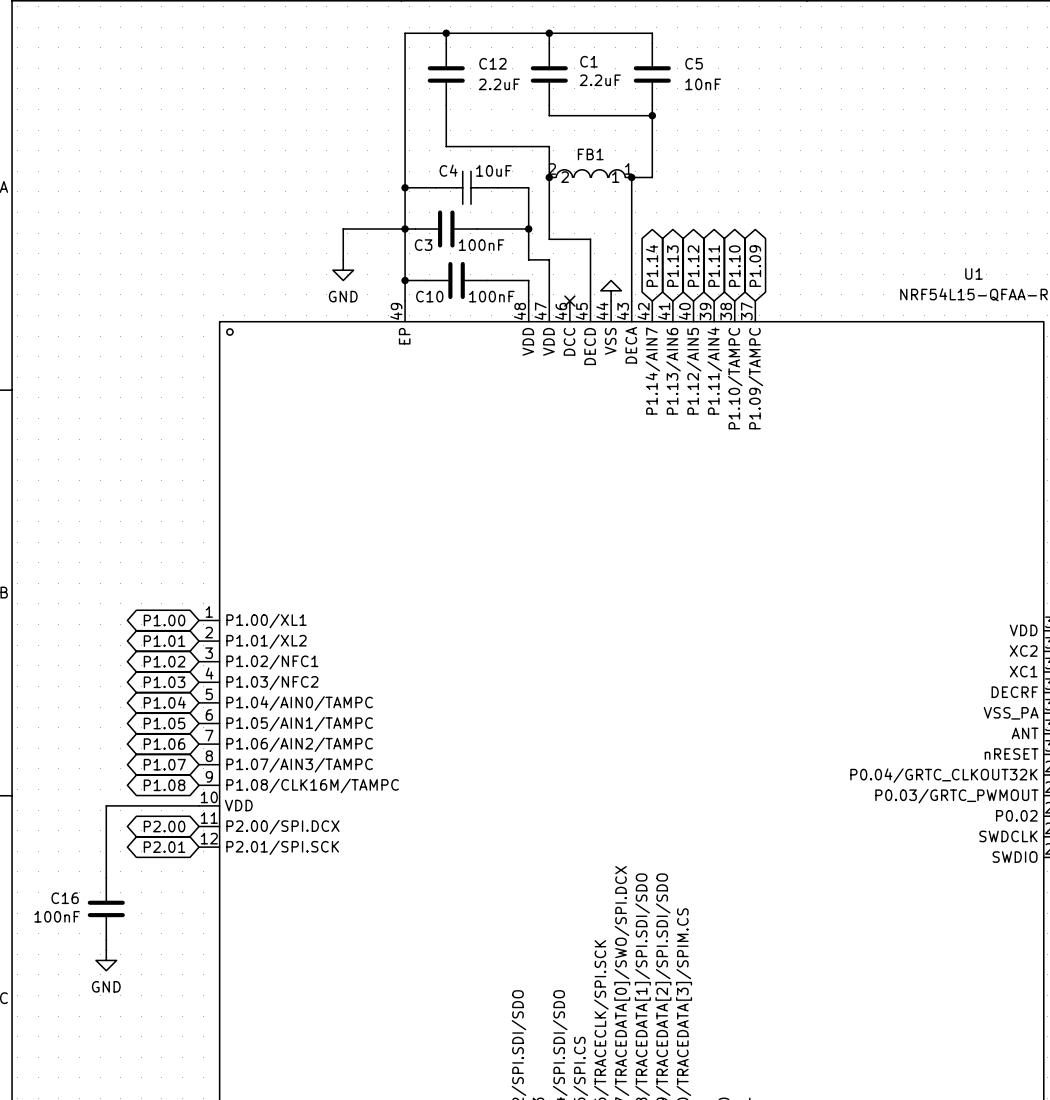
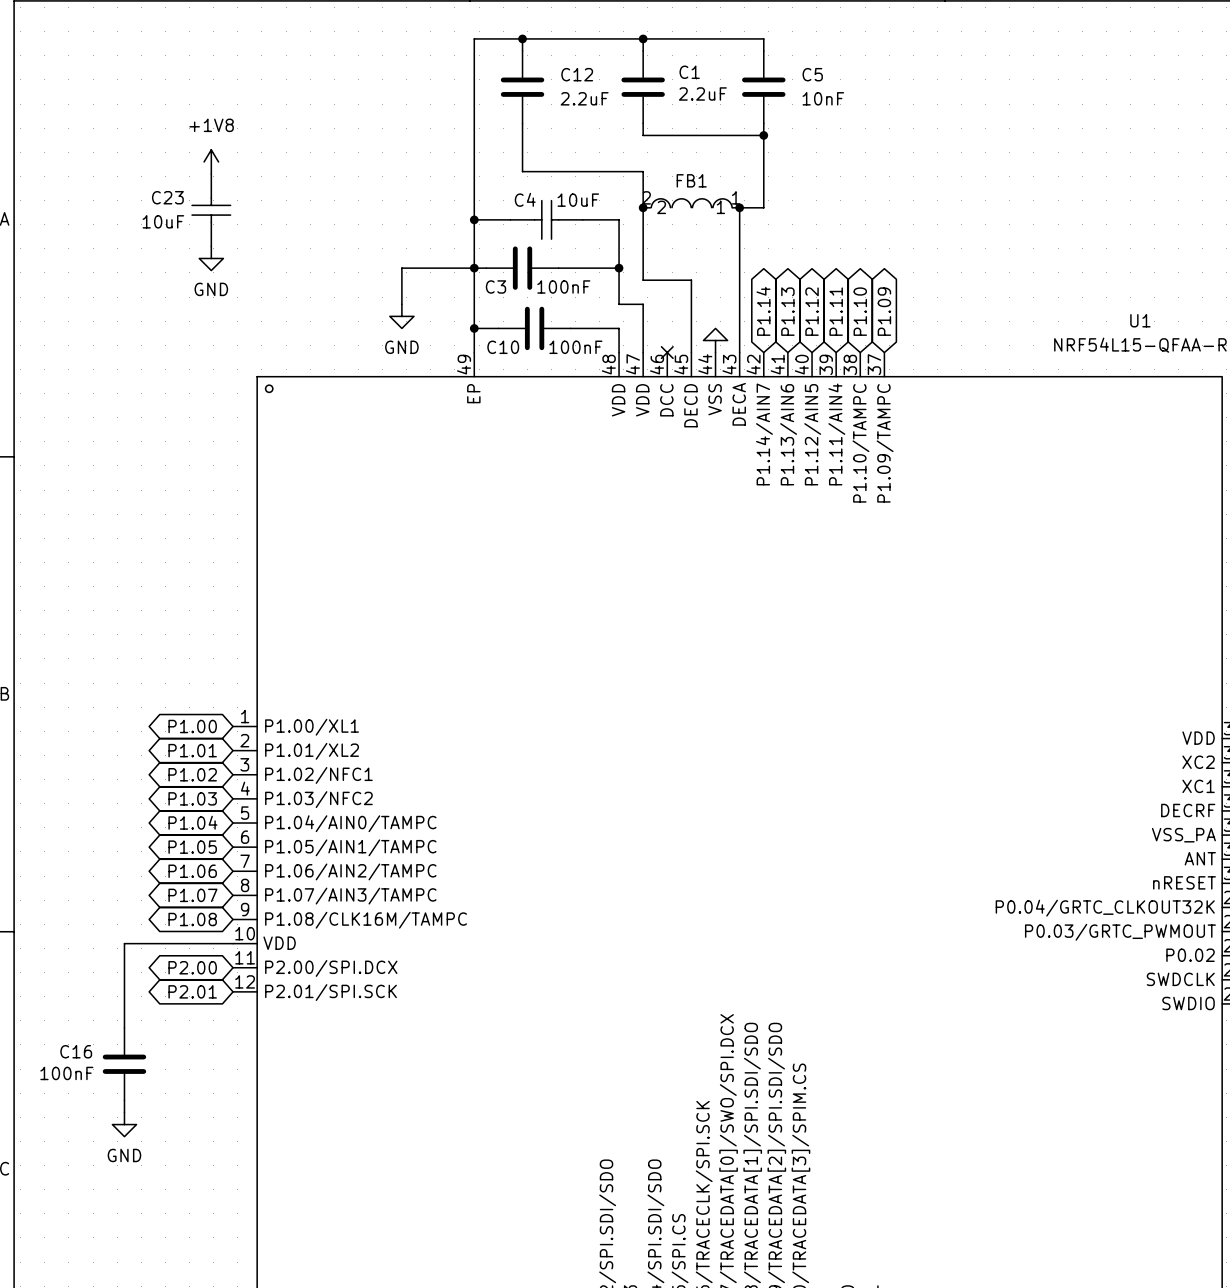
power symbol: none -> +1V8 (211, 161)
C23: none -> 10uF (211, 210)
power symbol: none -> GND (211, 258)

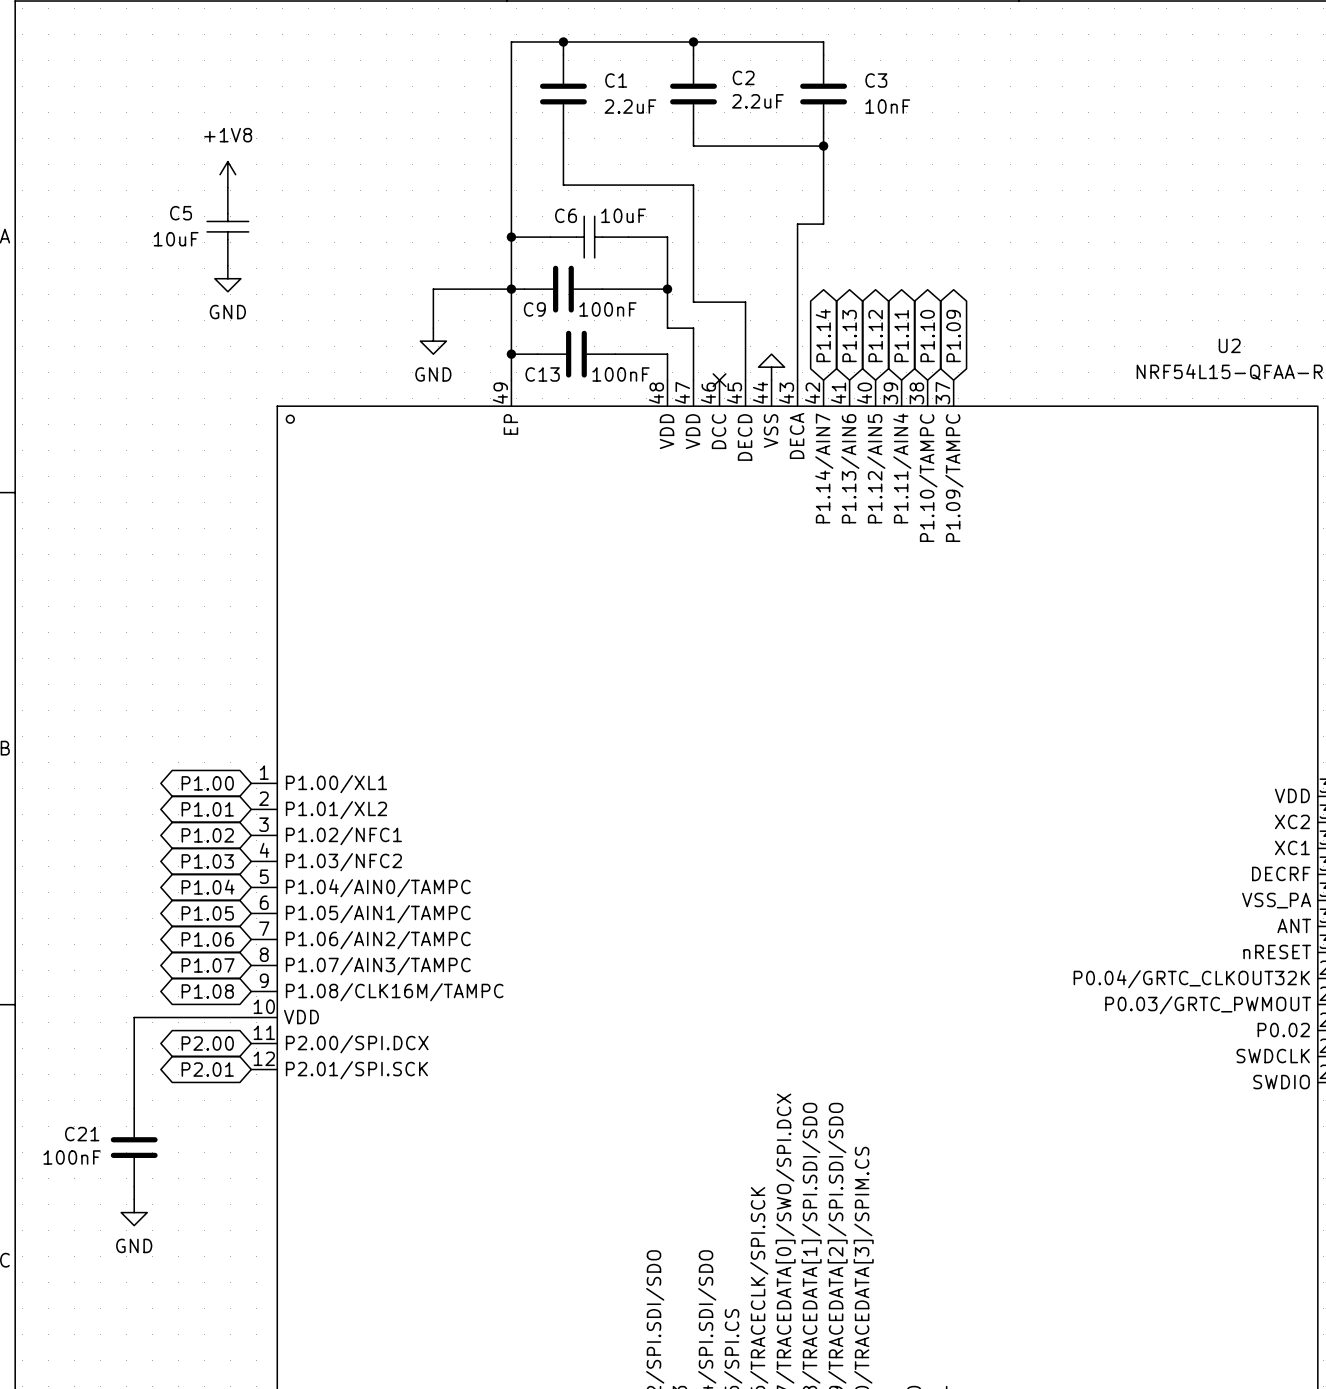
C1 name: C1 (689, 72) -> C2 (743, 77)
C12 name: C12 (577, 74) -> C1 (616, 80)
C5 name: C5 (812, 74) -> C3 (876, 80)
C23 name: C23 (167, 197) -> C5 (181, 213)
C4 name: C4 (525, 199) -> C6 (566, 215)
FB1: (691, 203) -> none
junction: (643, 207) -> none
junction: (739, 207) -> none
C3 name: C3 (495, 286) -> C9 (534, 309)
U1 name: U1 (1140, 320) -> U2 (1229, 345)
C10 name: C10 (503, 347) -> C13 (542, 374)
C16 name: C16 (76, 1051) -> C21 (82, 1134)

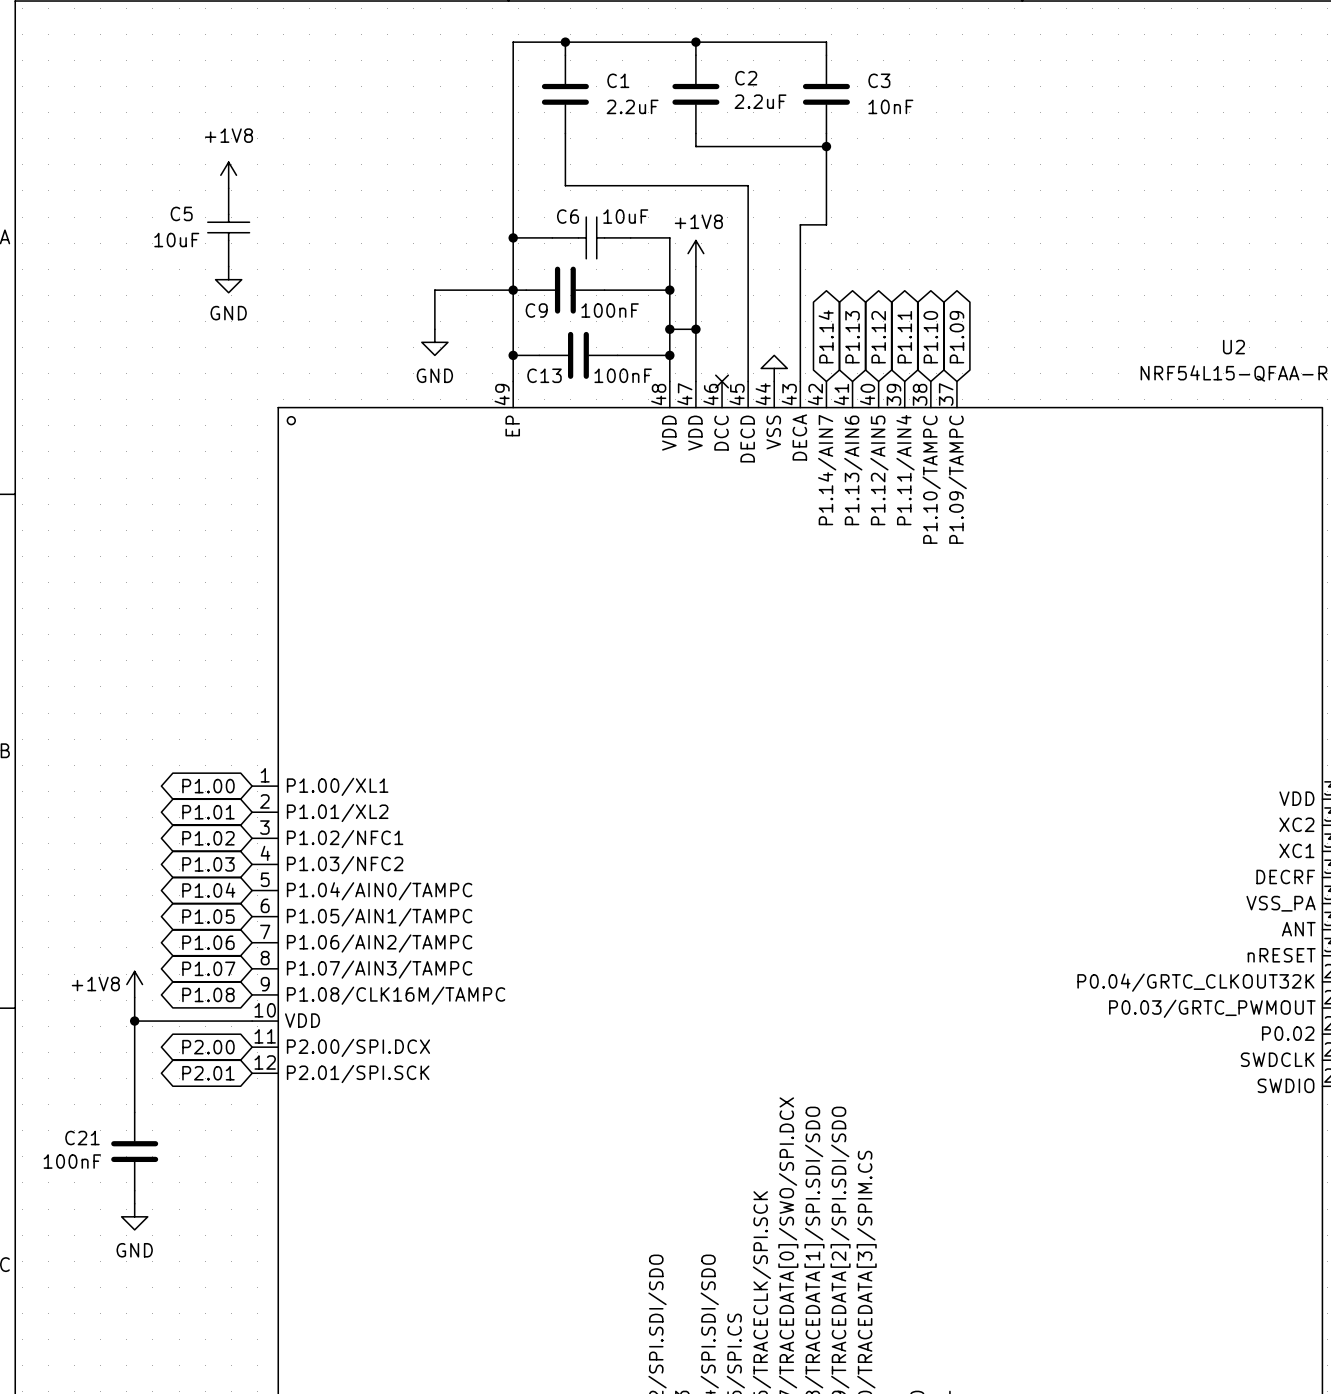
wire: (693, 185) (693, 265) -> (695, 185) (748, 185) (748, 303)
power symbol: none -> +1V8 (695, 253)
wire: (693, 302) (745, 302) -> (695, 303) (695, 329)
wire: none -> (669, 329) (669, 355)
junction: none -> (669, 329)
junction: none -> (695, 329)
junction: none -> (669, 355)
power symbol: none -> +1V8 (134, 984)
wire: none -> (134, 997) (134, 1021)
junction: none -> (134, 1021)

